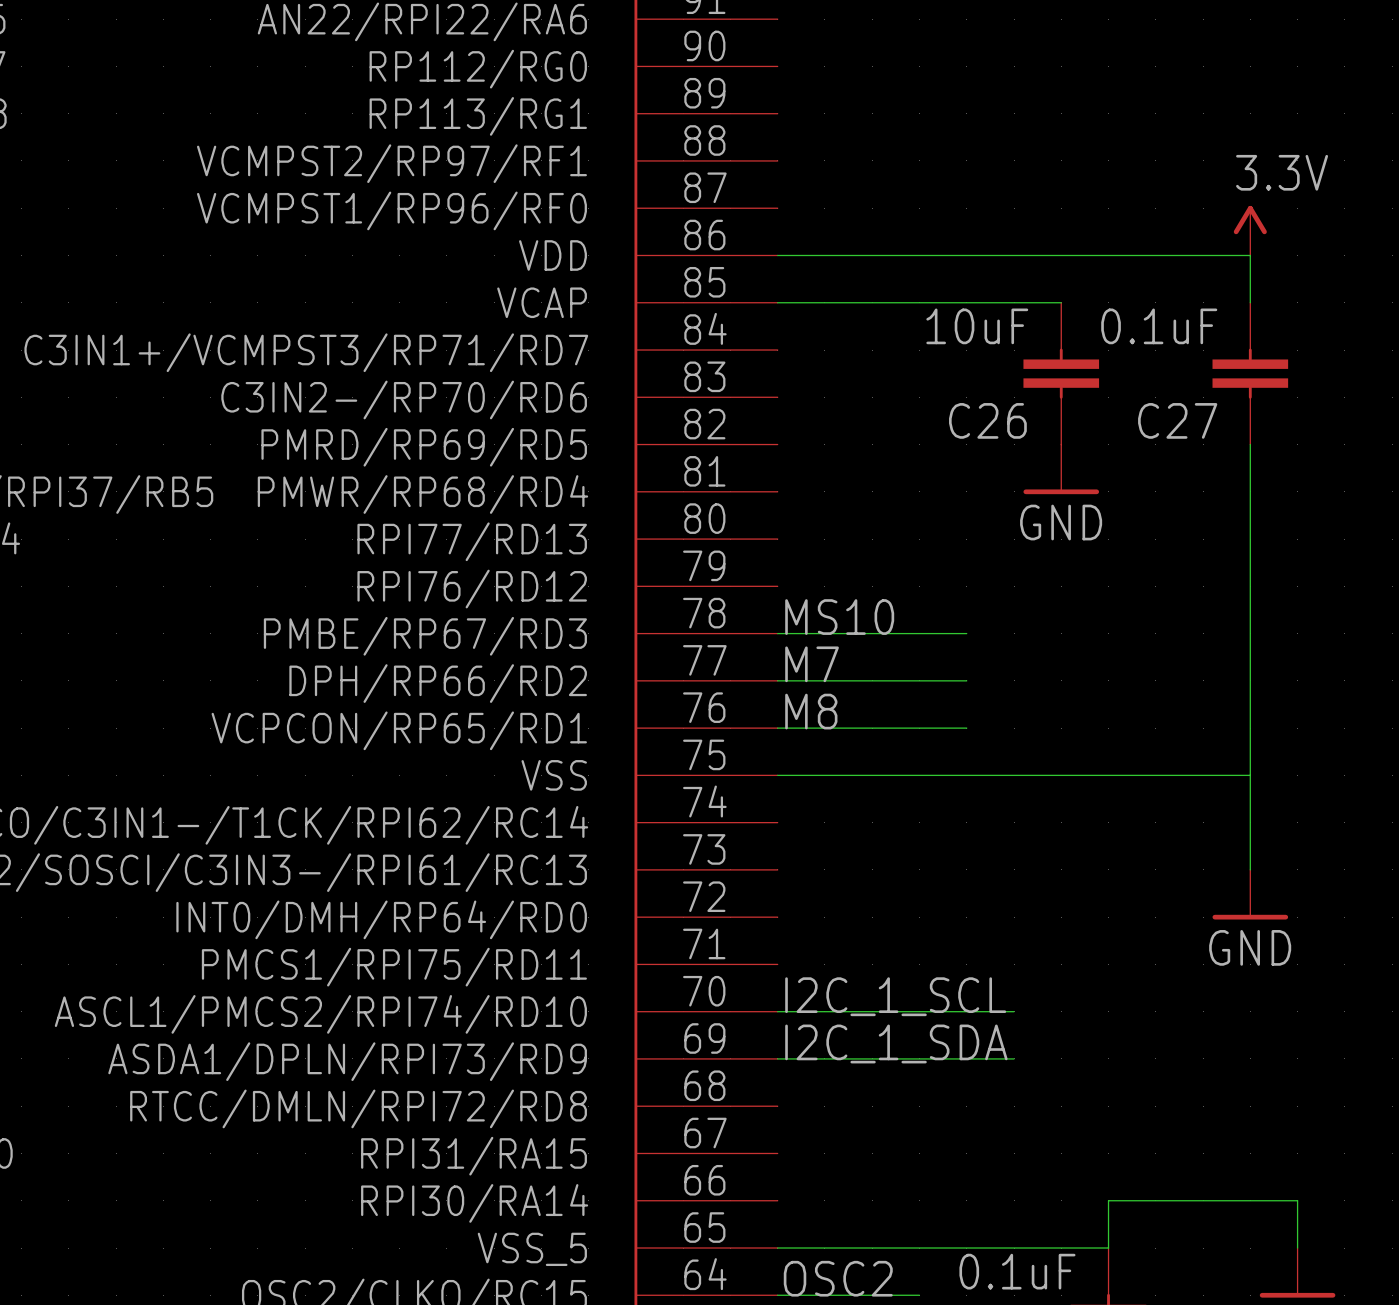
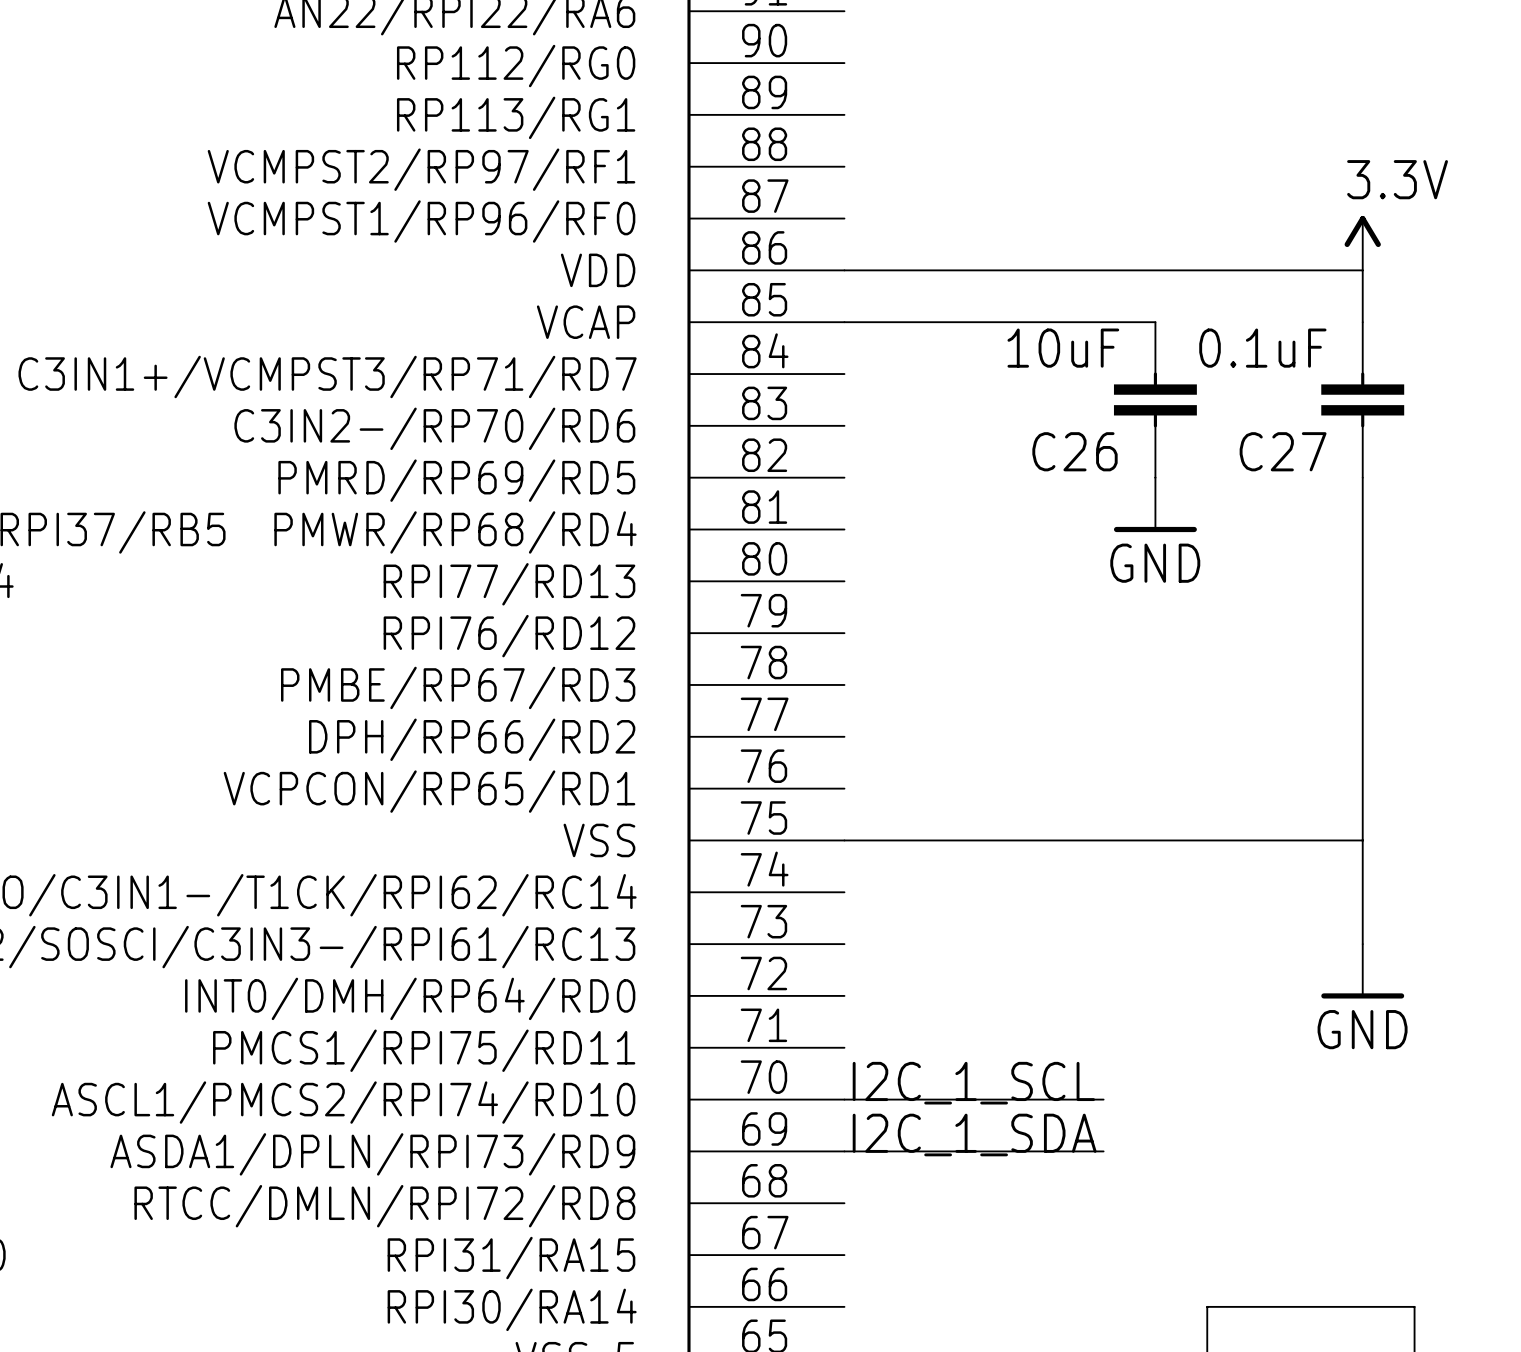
label: MS10 (839, 617) -> none
wire: (777, 633) (966, 633) -> none
label: M7 (812, 664) -> none
wire: (777, 680) (966, 680) -> none
label: M8 (811, 711) -> none
wire: (777, 728) (966, 728) -> none

